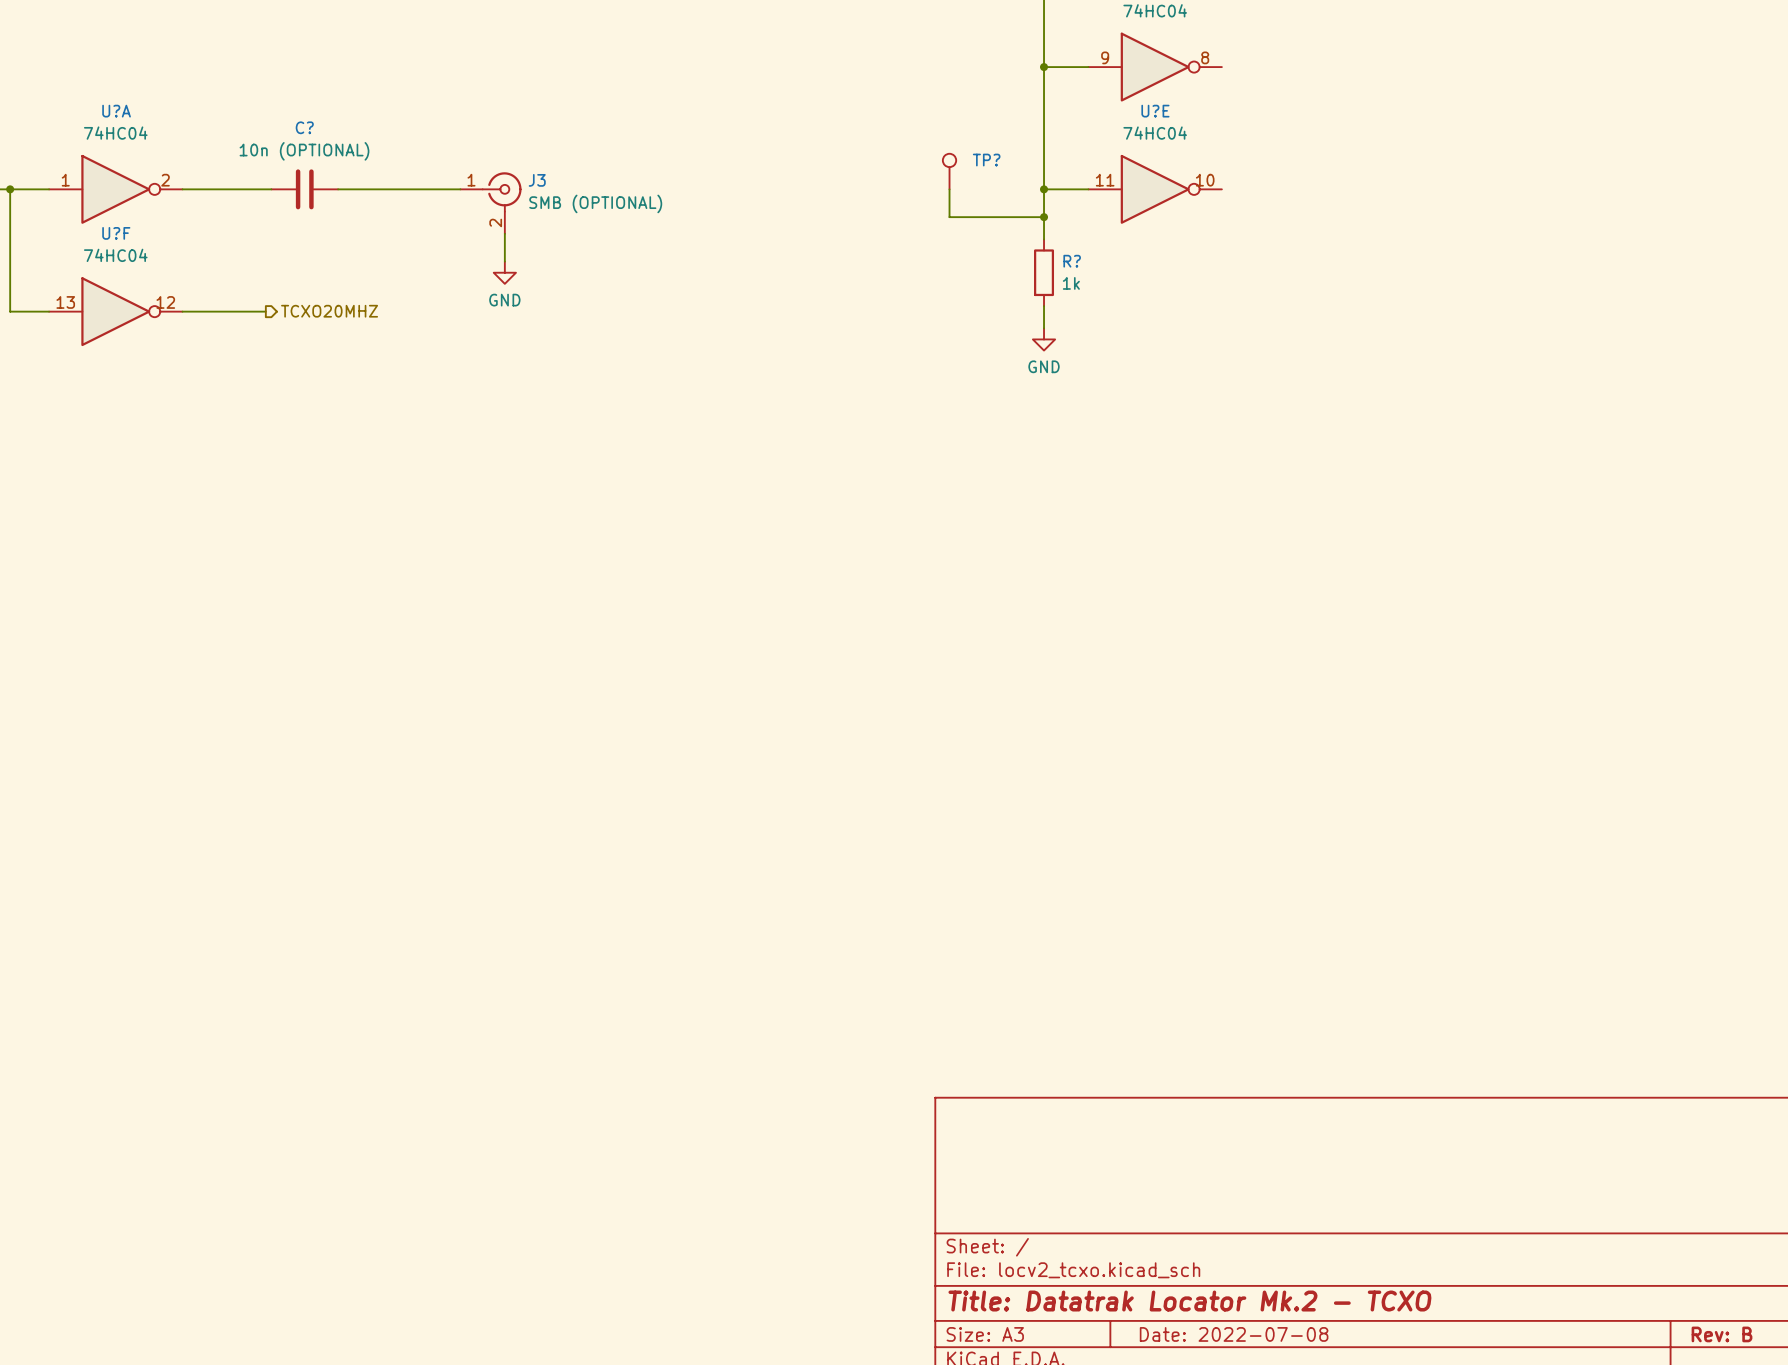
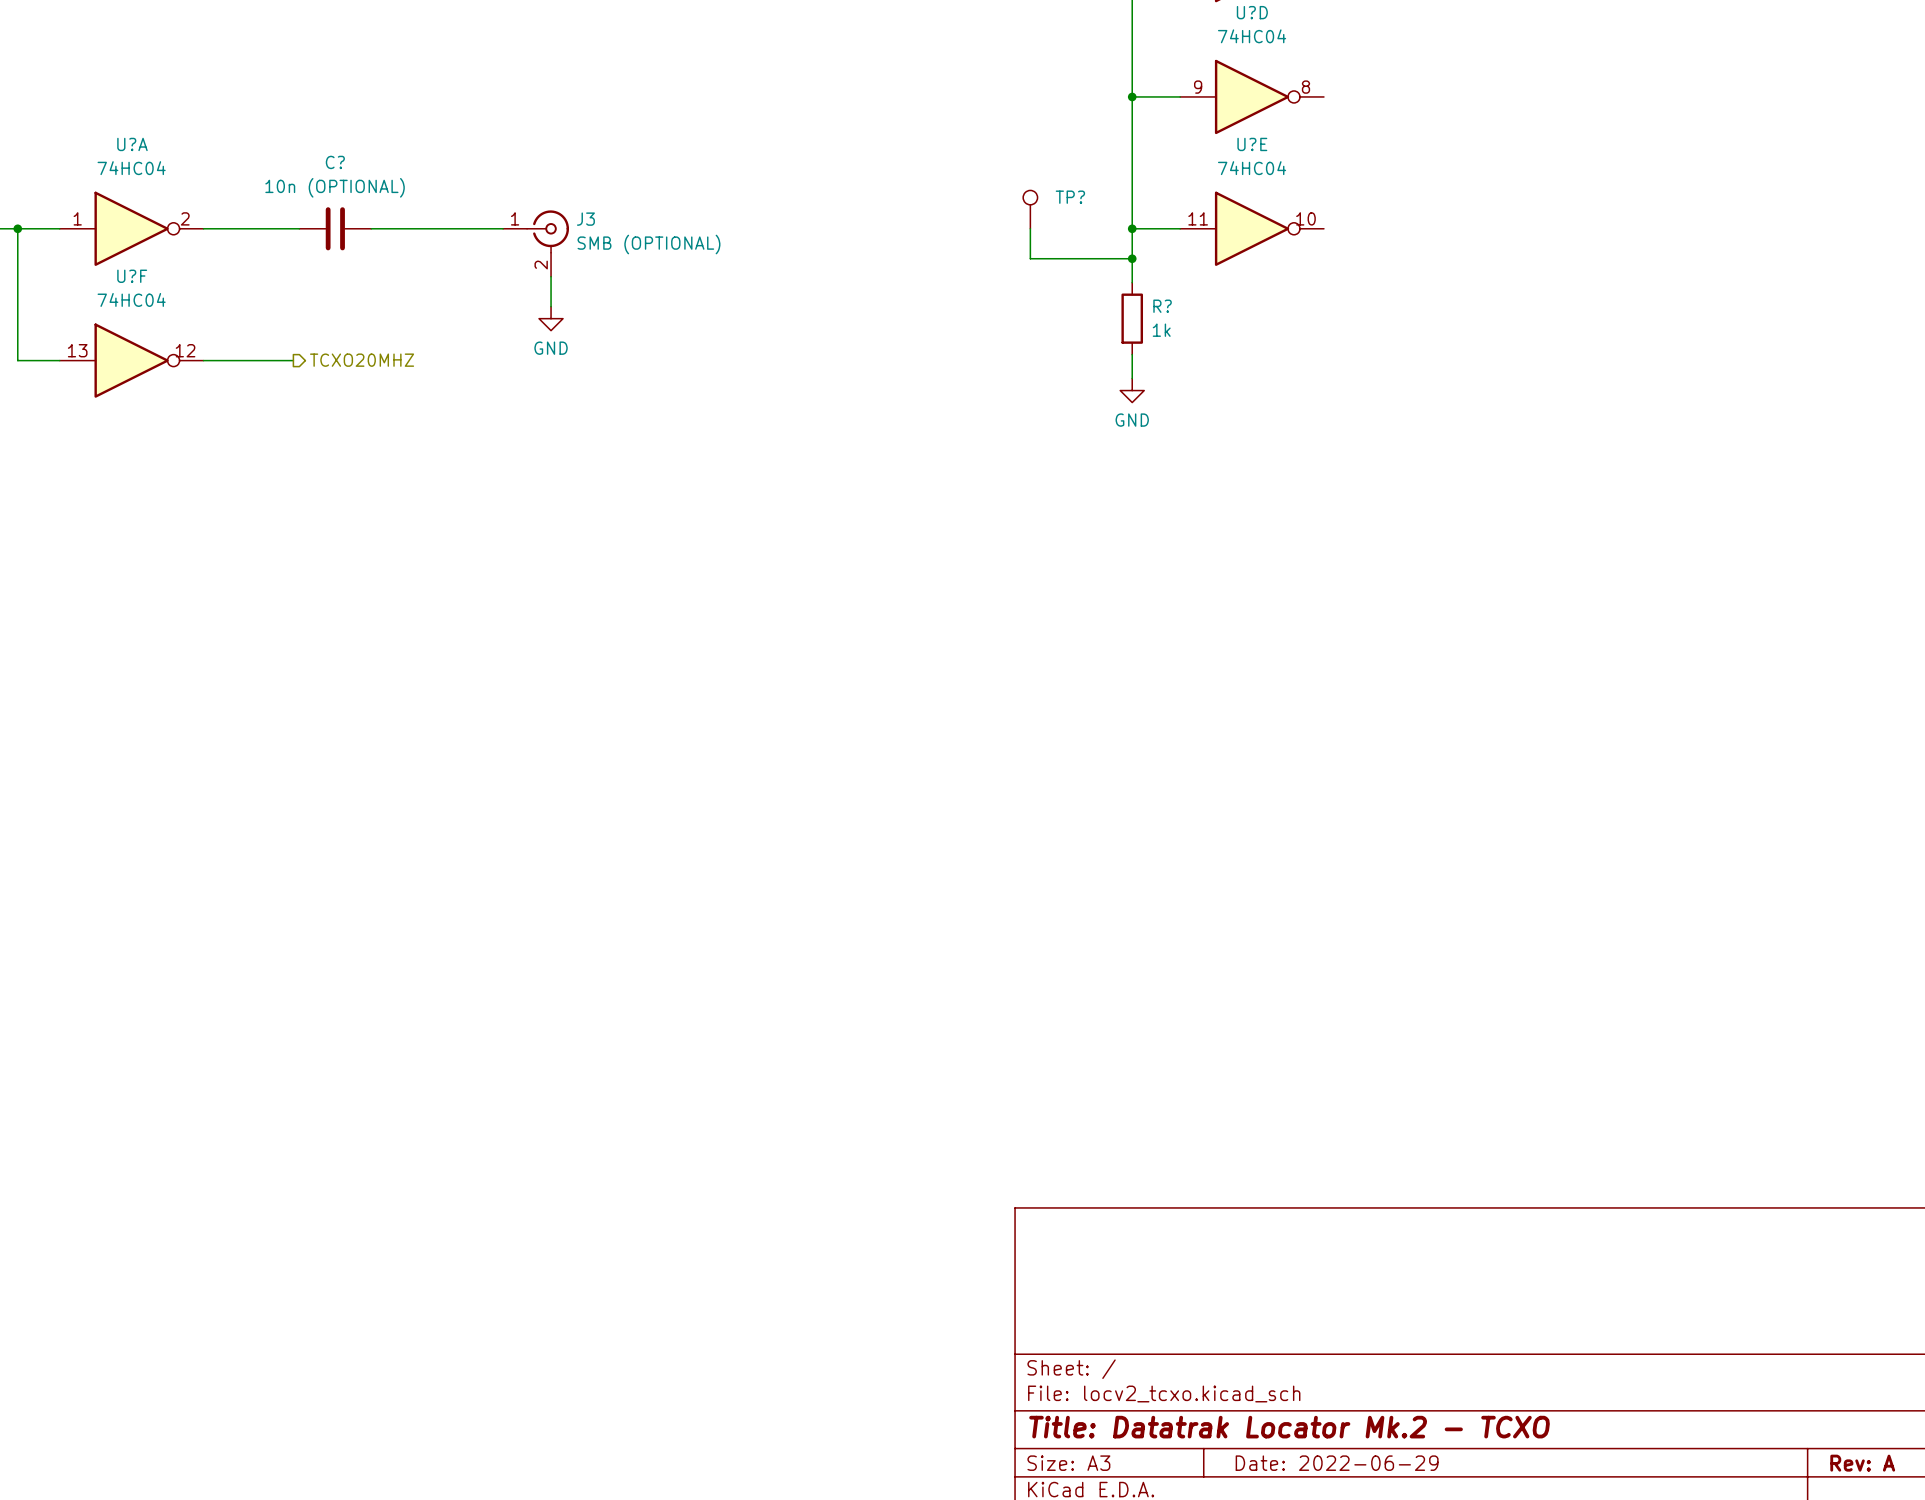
title block: Date: 2022-07-08 (1234, 1334) -> Date: 2022-06-29 (1337, 1463)
title block: Rev: B (1722, 1334) -> Rev: A (1862, 1463)

